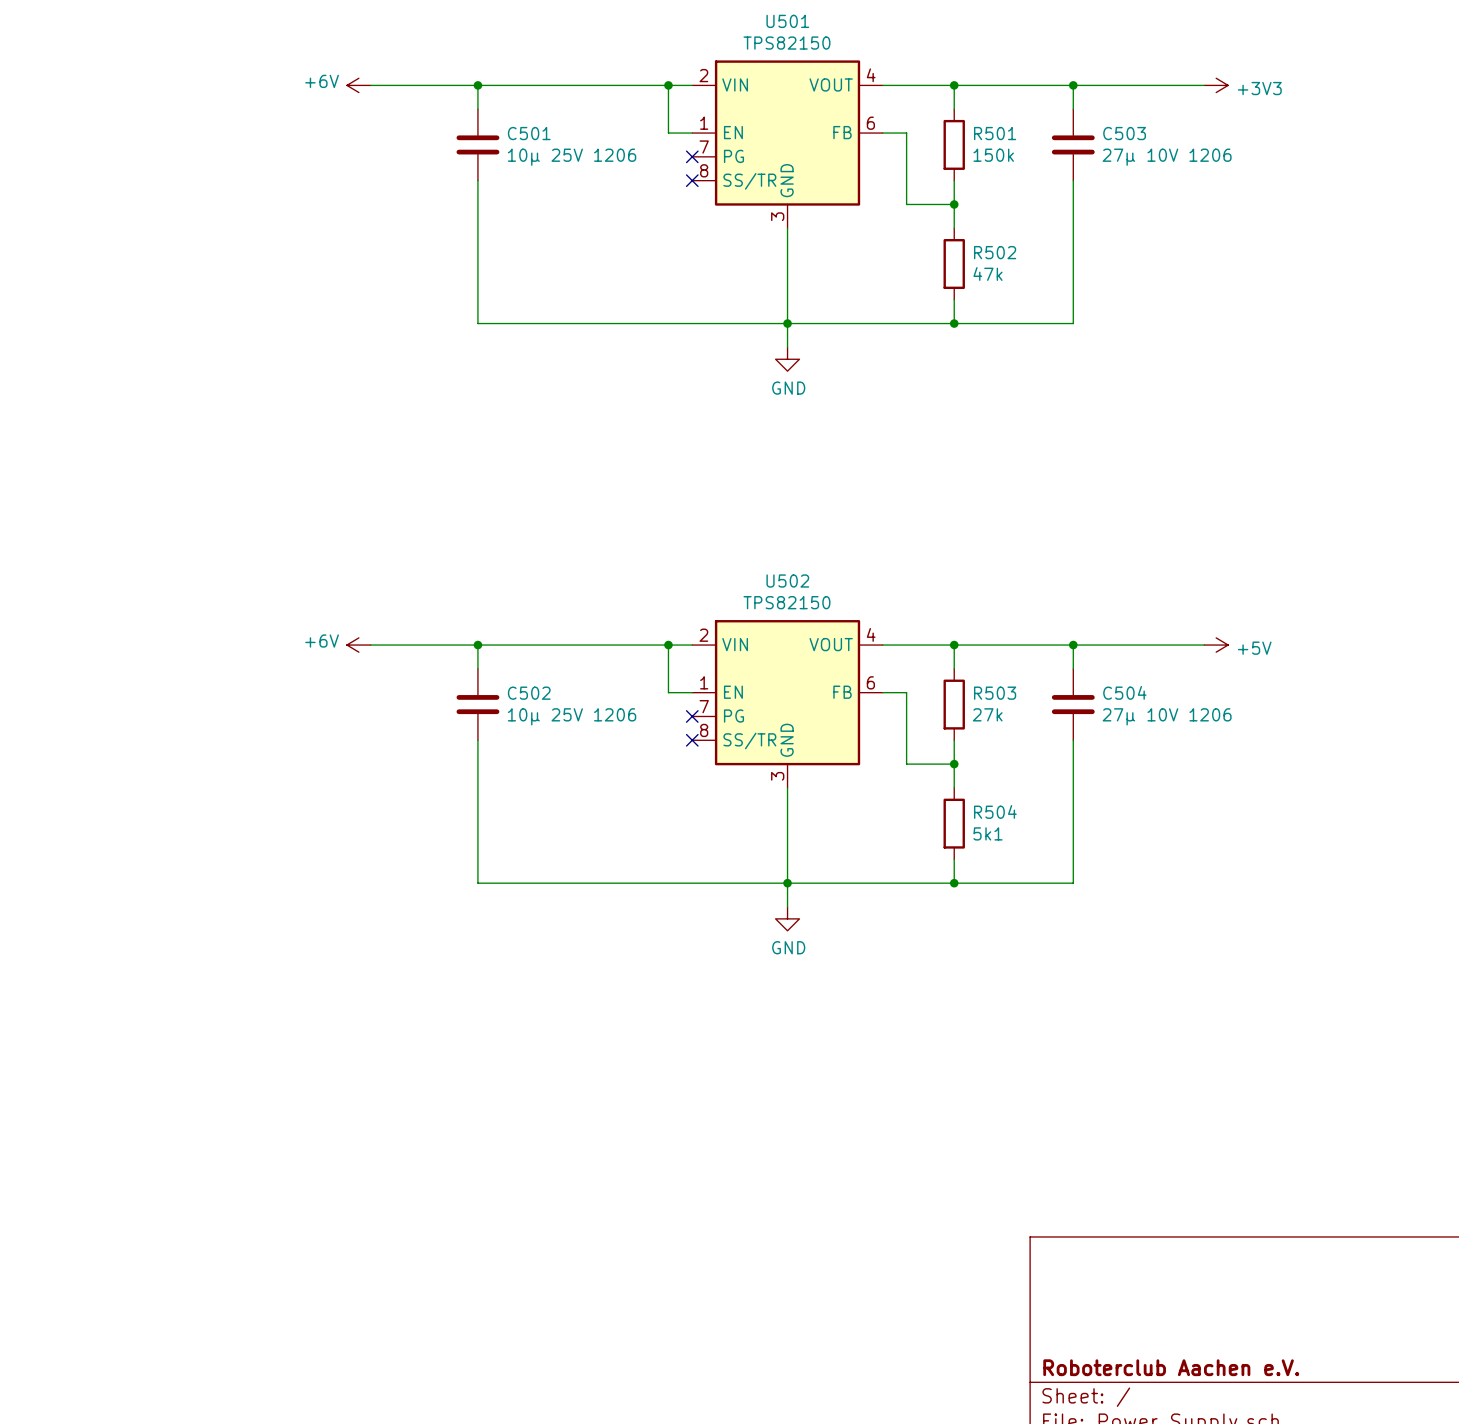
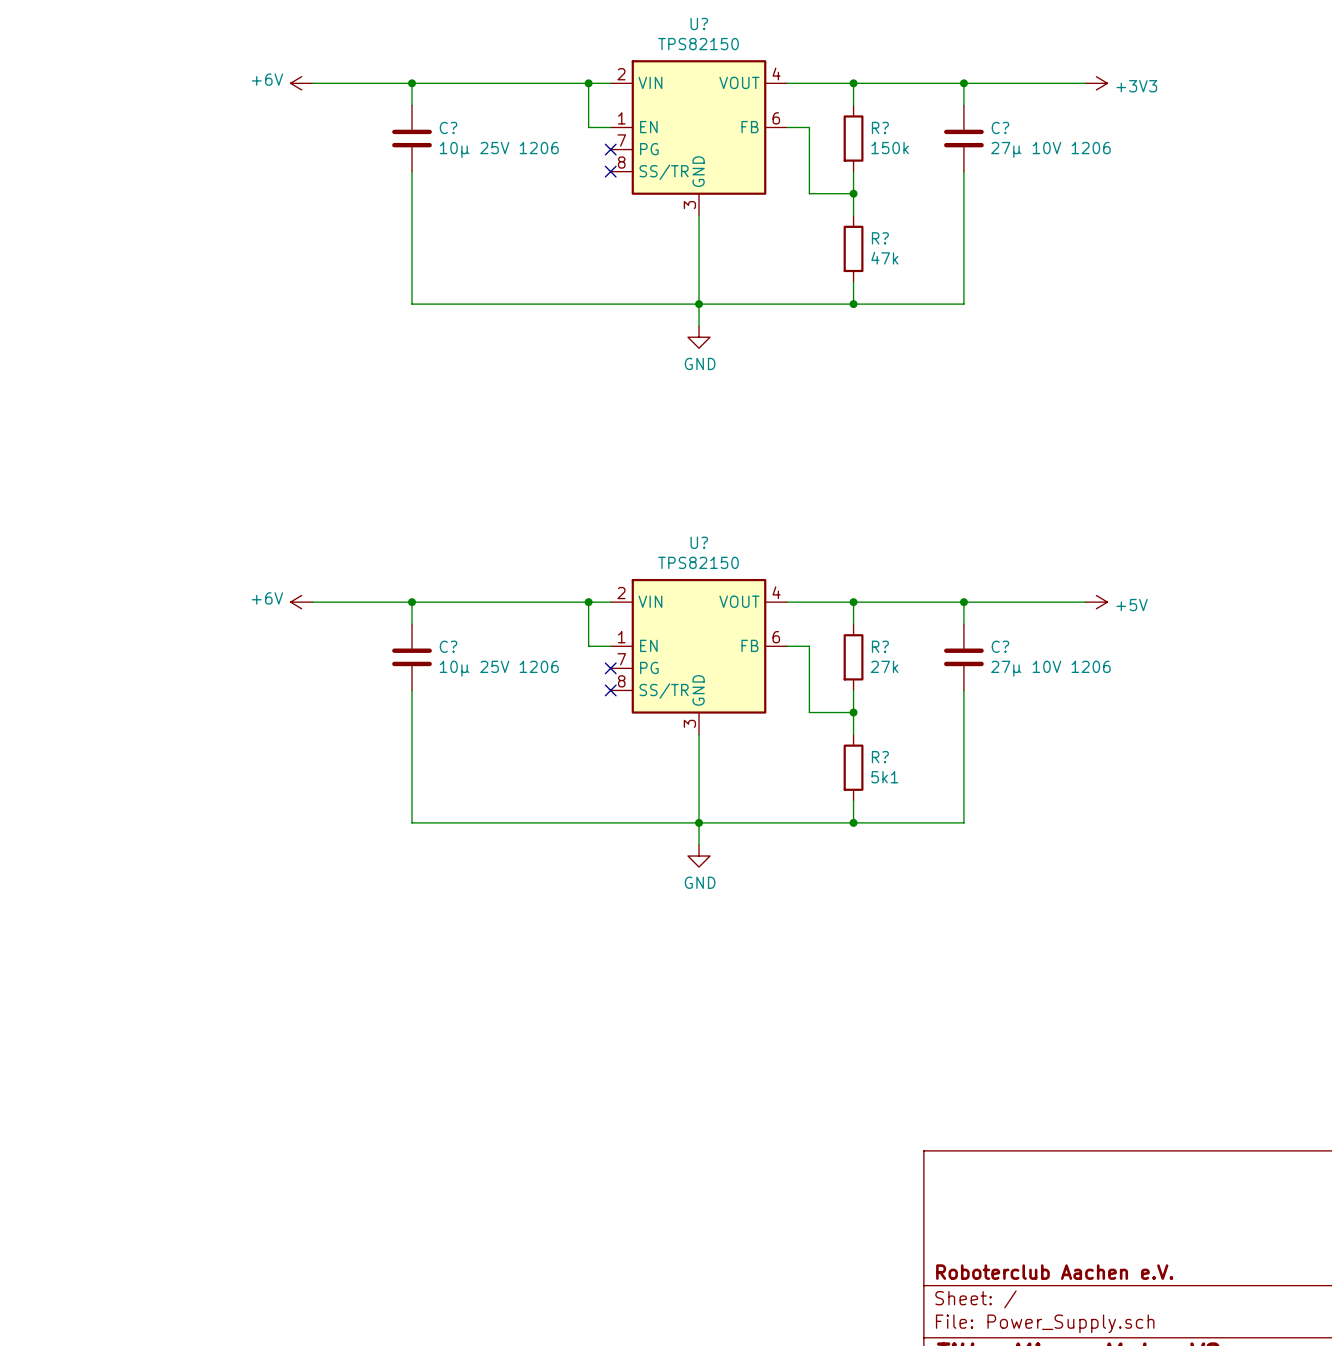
U501 name: U501 (787, 21) -> U? (699, 23)
C501 name: C501 (529, 133) -> C? (448, 127)
R501 name: R501 (995, 133) -> R? (880, 127)
C503 name: C503 (1124, 133) -> C? (1000, 127)
R502 name: R502 (995, 252) -> R? (880, 238)
U502 name: U502 (787, 581) -> U? (699, 542)
C504 name: C504 (1124, 692) -> C? (1000, 646)
C502 name: C502 (529, 693) -> C? (448, 646)
R503 name: R503 (995, 693) -> R? (880, 646)
R504 name: R504 (995, 811) -> R? (880, 757)

